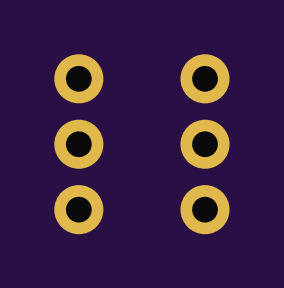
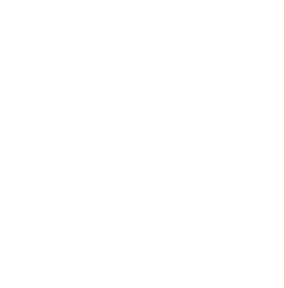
part: (78, 144) -> none
part: (205, 144) -> none

